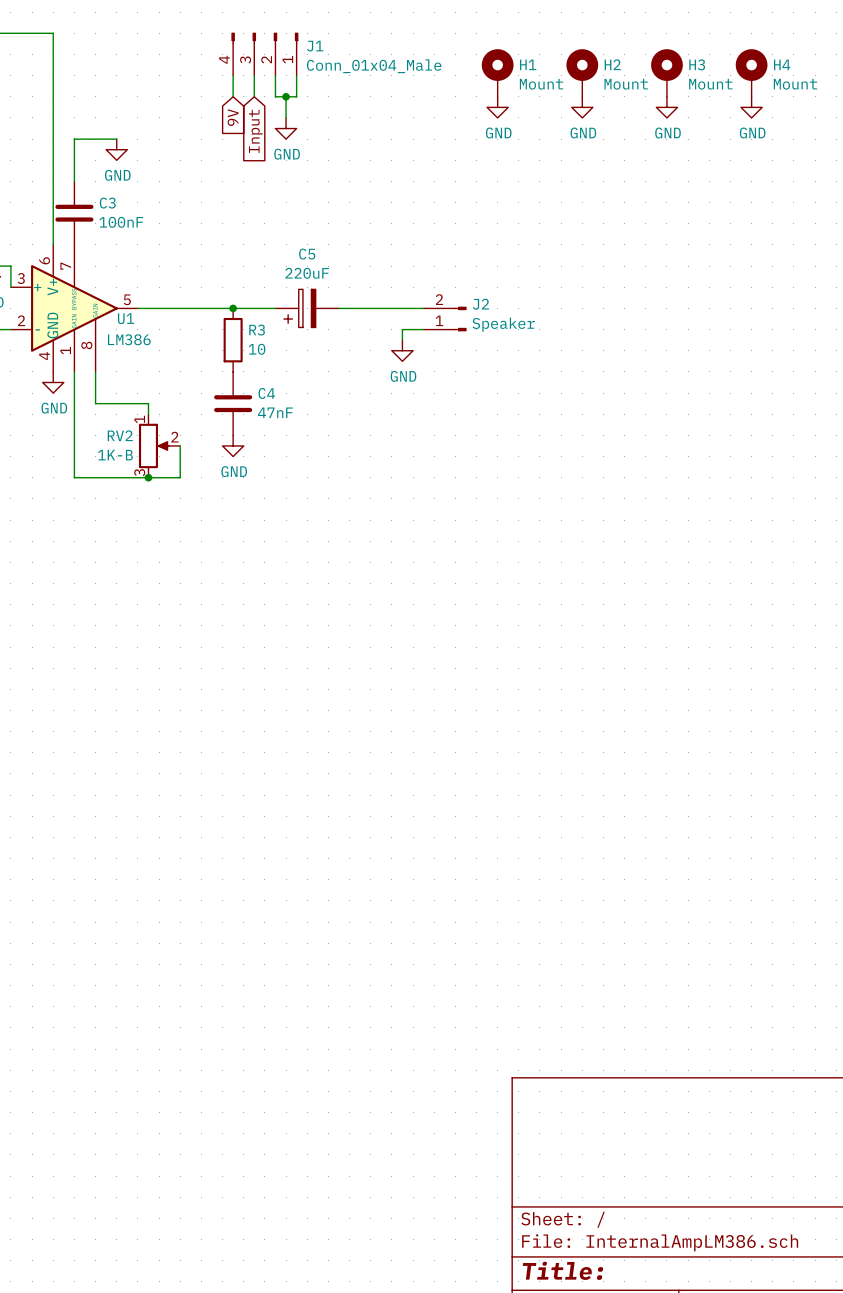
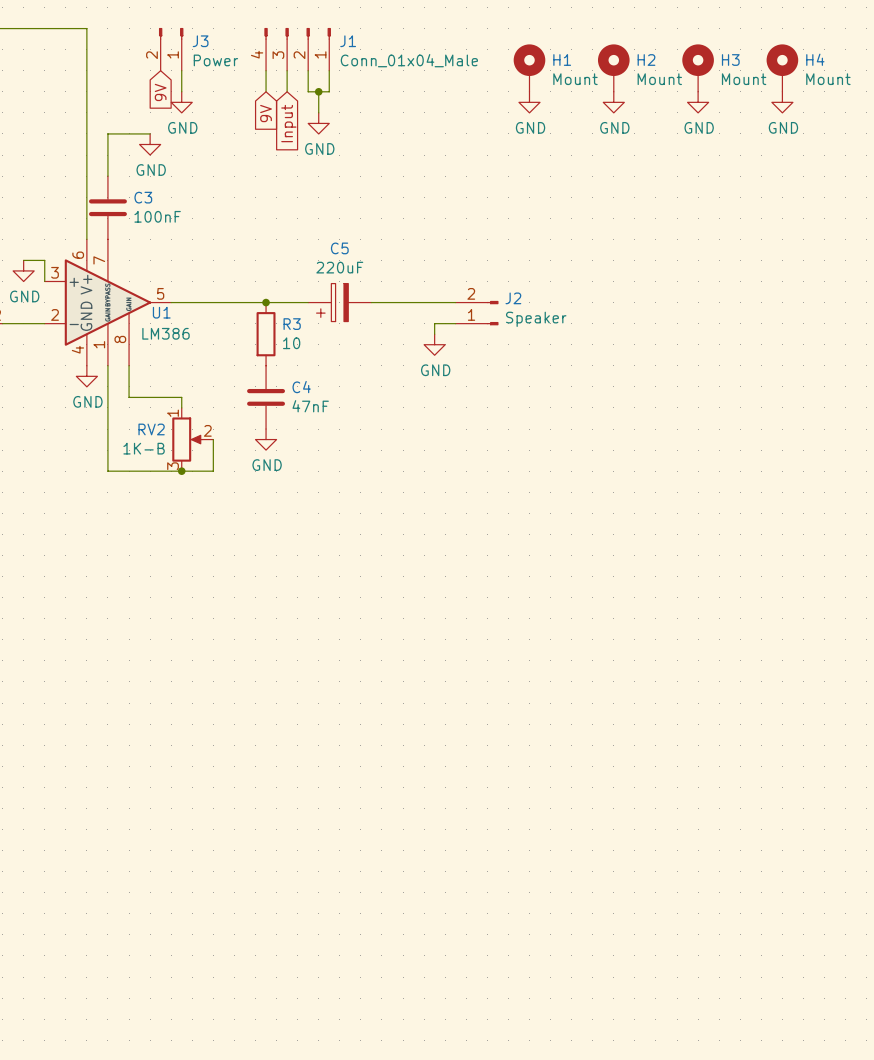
J3: none -> Power (171, 49)
wire: none -> (181, 70) (181, 91)
global label: none -> 9V (160, 92)
power symbol: none -> GND (181, 102)

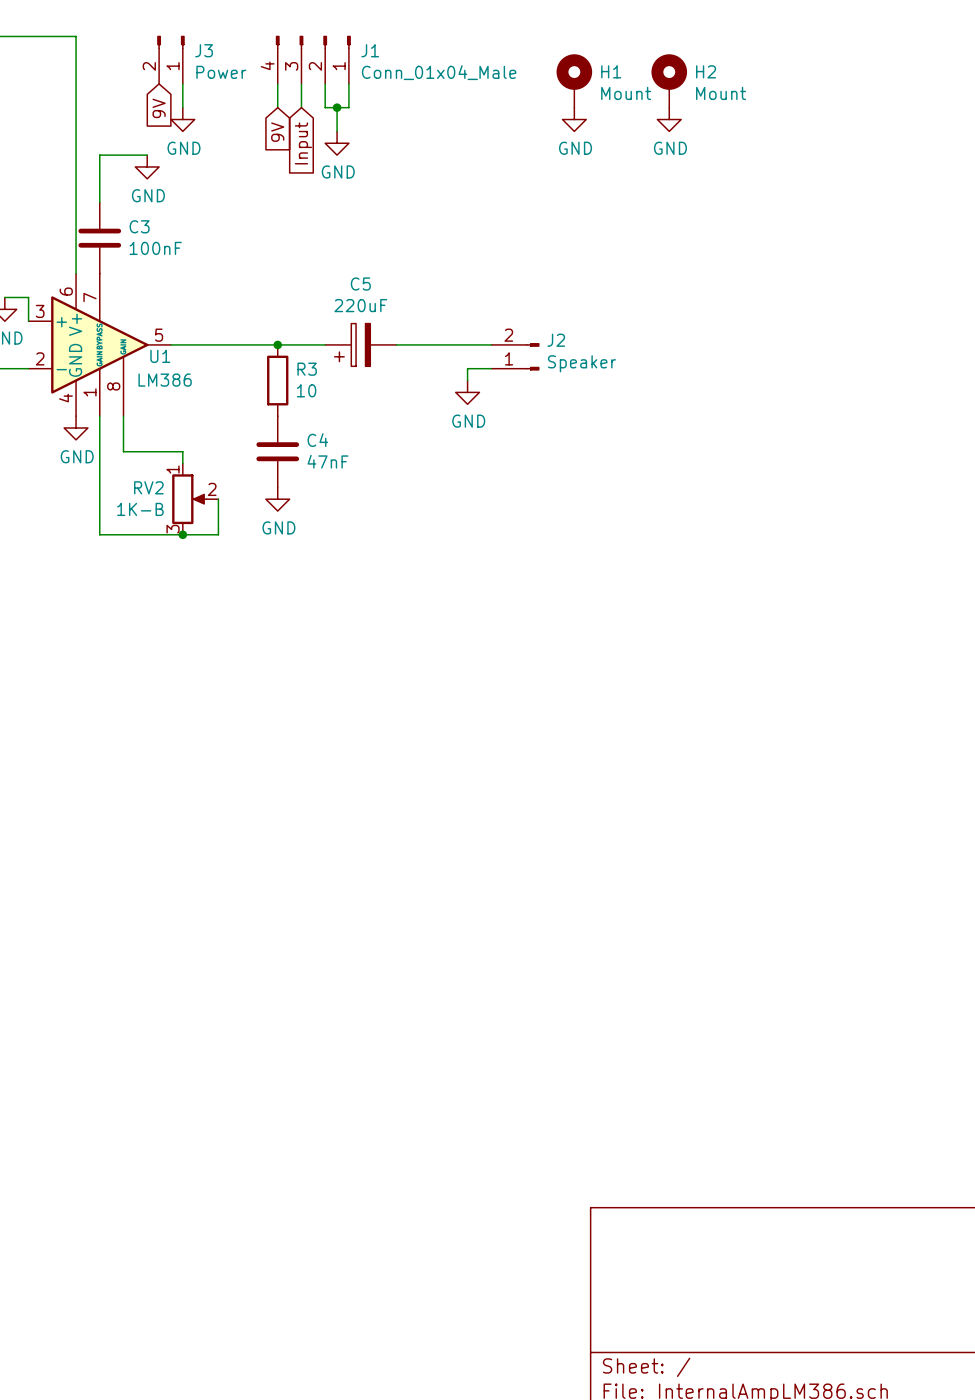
H3: Mount (698, 68) -> none
H4: Mount (782, 68) -> none
power symbol: GND (698, 102) -> none
power symbol: GND (782, 102) -> none

